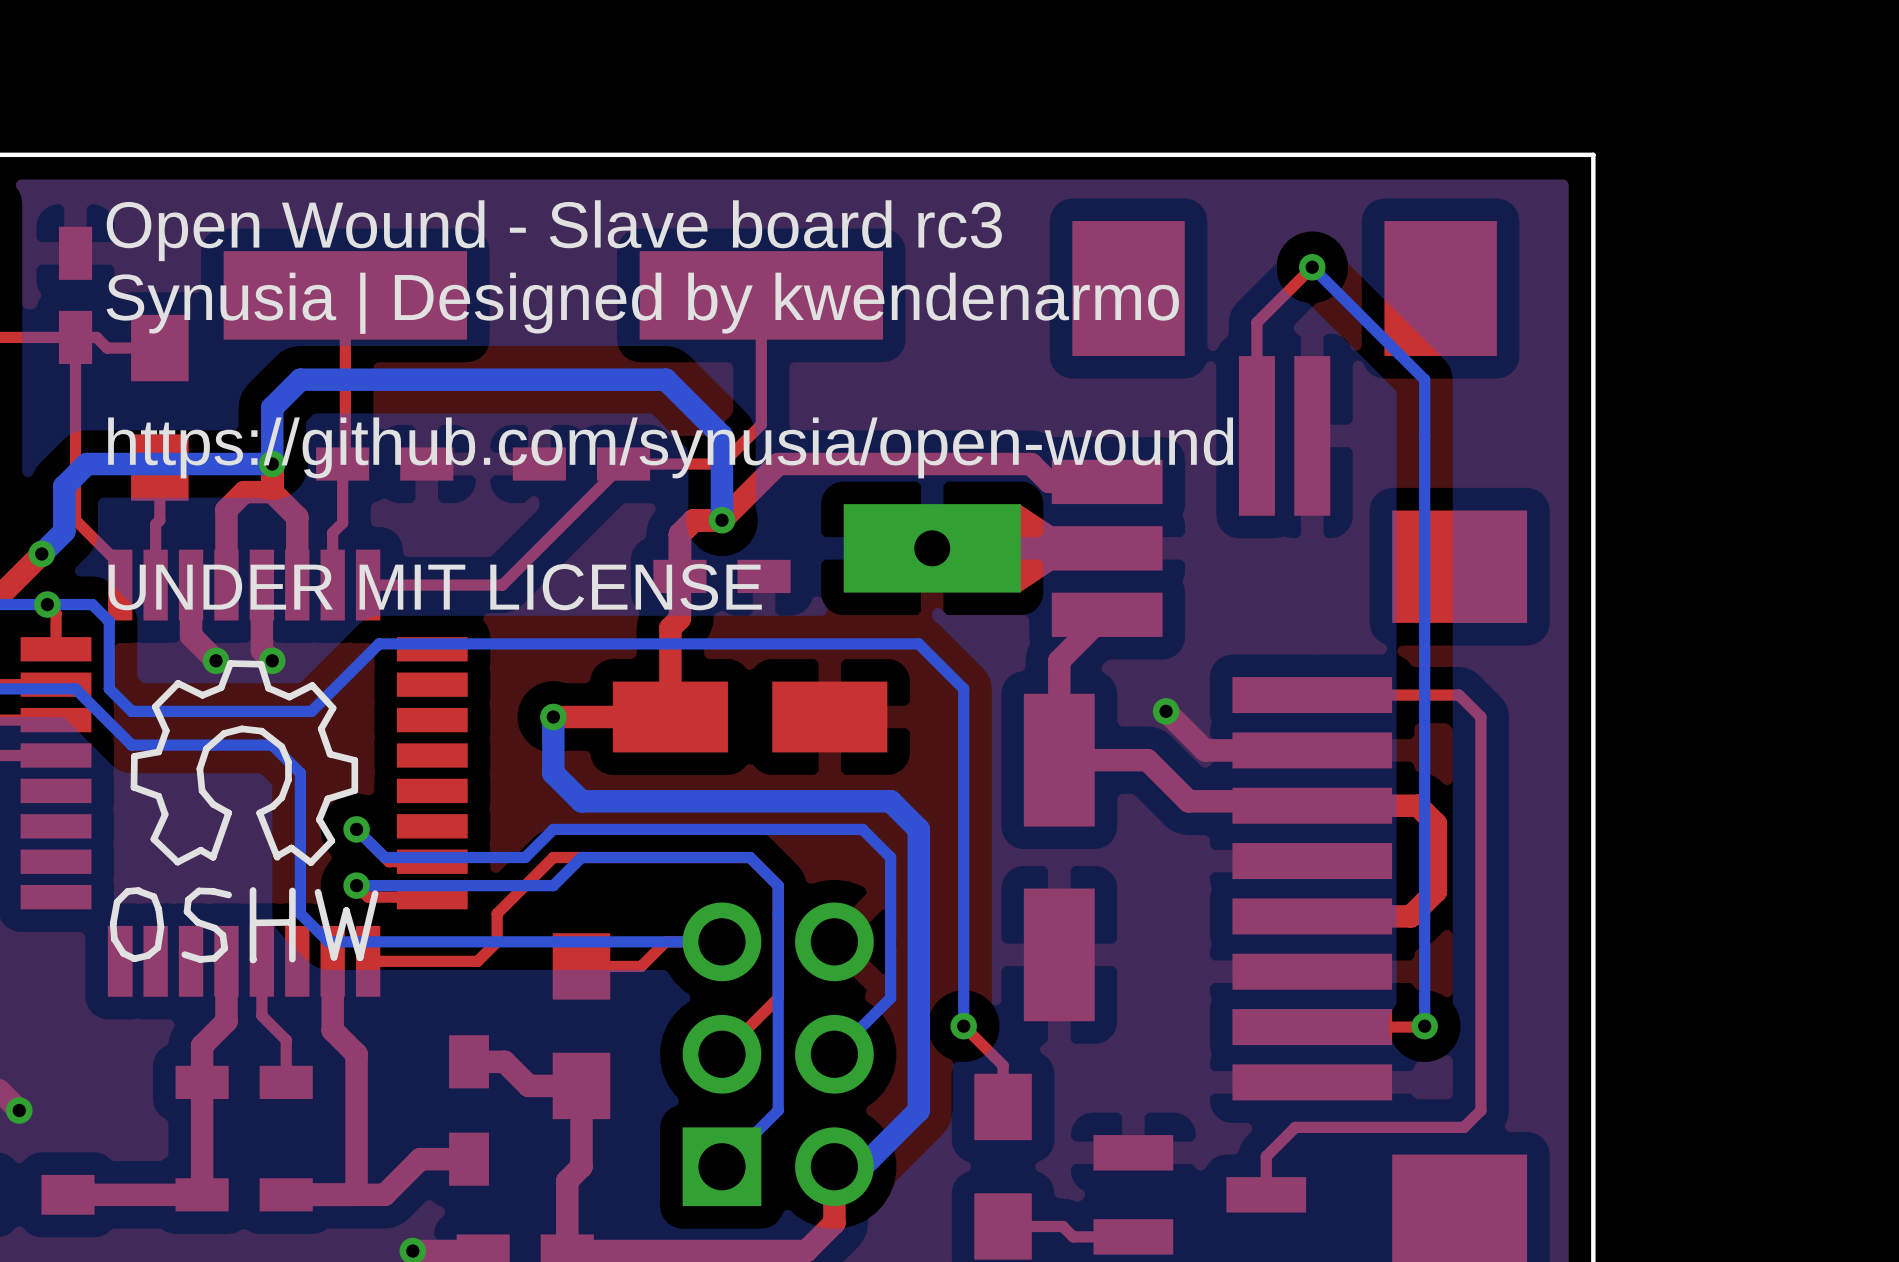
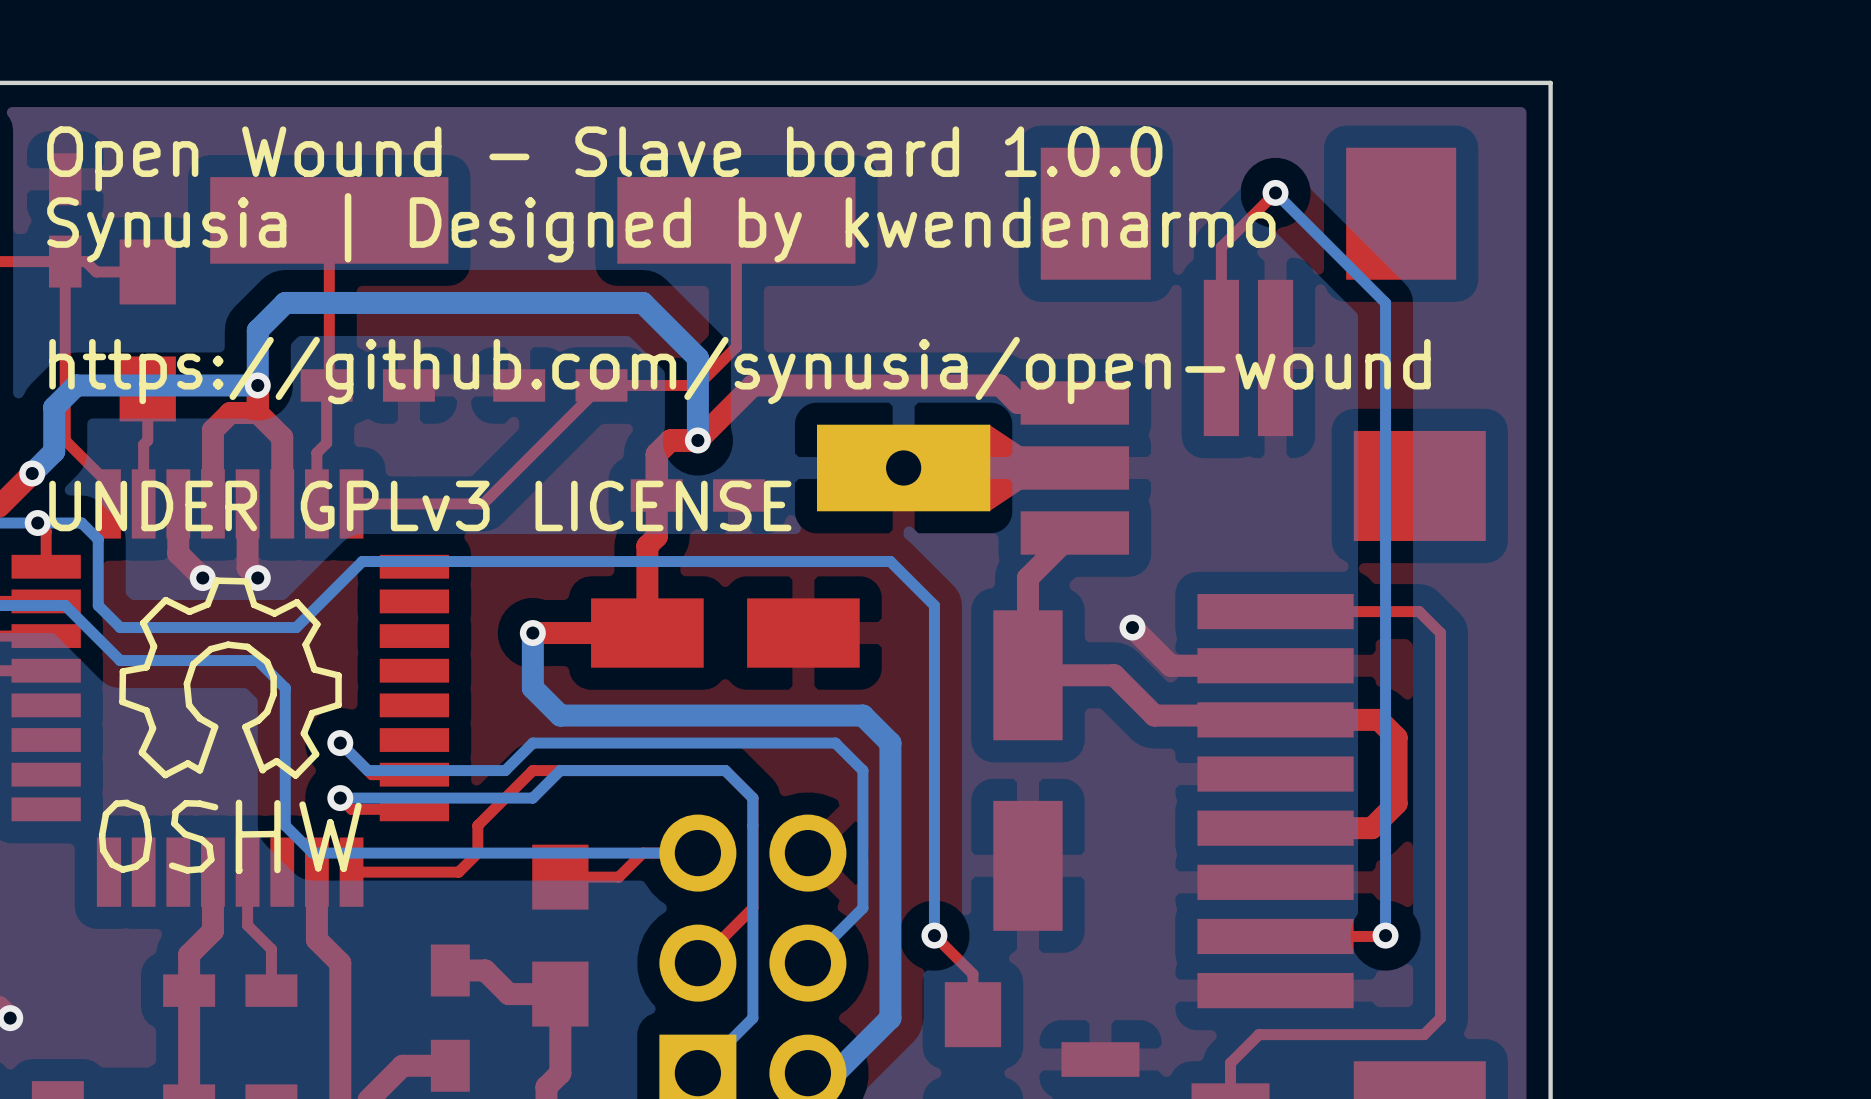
text: Open Wound - Slave board rc3 (554, 230) -> Open Wound - Slave board 1.0.0 (604, 159)
text position: Synusia | Designed by kwendenarmo (642, 303) -> Synusia | Designed by kwendenarmo (661, 227)
text position: https://github.com/synusia/open-wound (670, 447) -> https://github.com/synusia/open-wound (739, 370)
text: UNDER MIT LICENSE (435, 587) -> UNDER GPLv3 LICENSE (420, 505)

